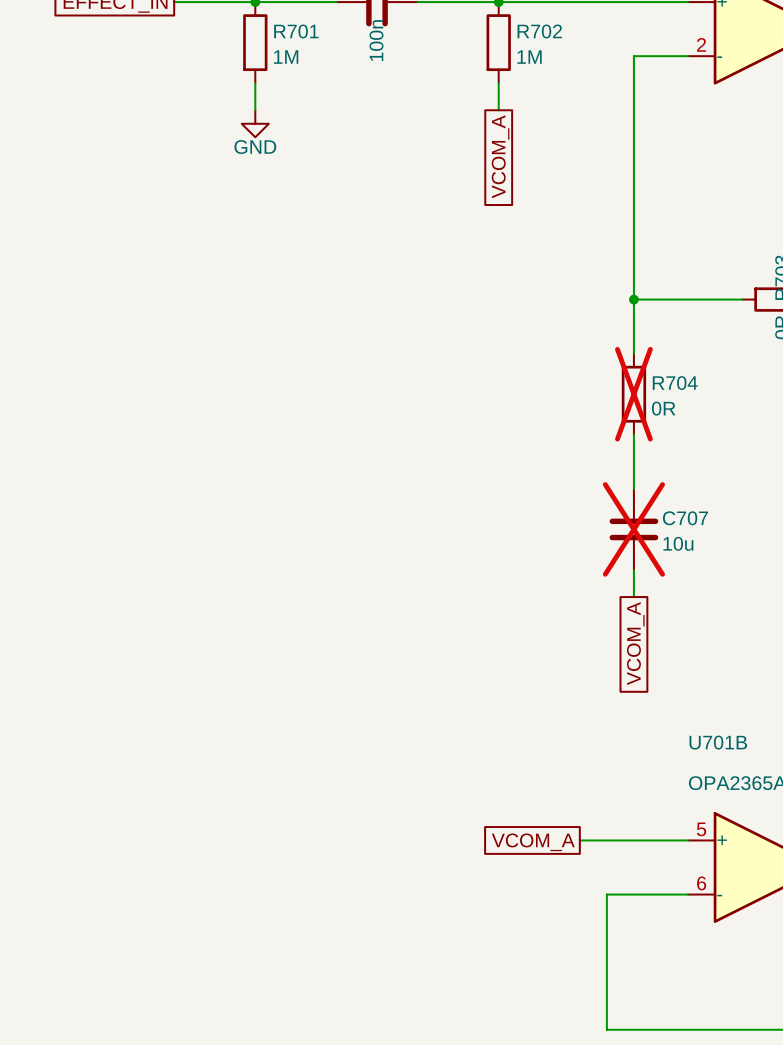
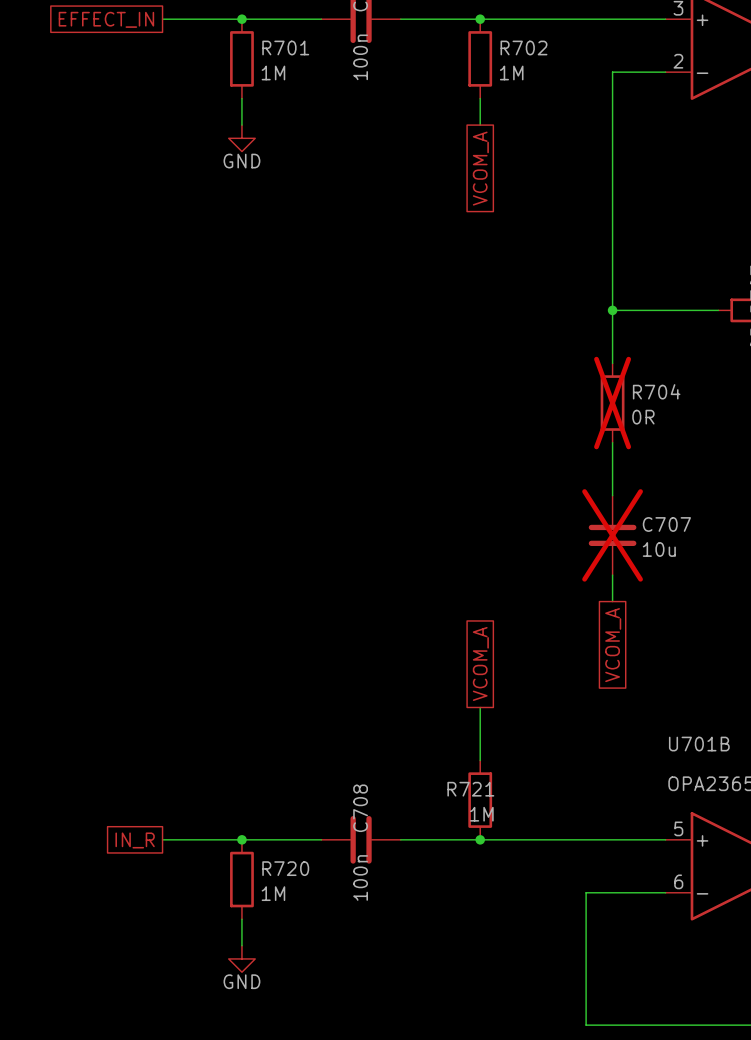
wire: none -> (480, 707) (480, 760)
R721: none -> 1M (480, 800)
wire: none -> (162, 839) (321, 839)
junction: none -> (241, 839)
C708: none -> 100n (361, 839)
wire: none -> (400, 839) (559, 839)
junction: none -> (480, 839)
global label: none -> IN_R (135, 840)
global label rotation: 0° (533, 842) -> 90° clockwise (480, 663)
global label position: VCOM_A (533, 842) -> VCOM_A (480, 663)
R720: none -> 1M (241, 879)
wire: none -> (241, 919) (241, 945)
power symbol: none -> GND (241, 958)

